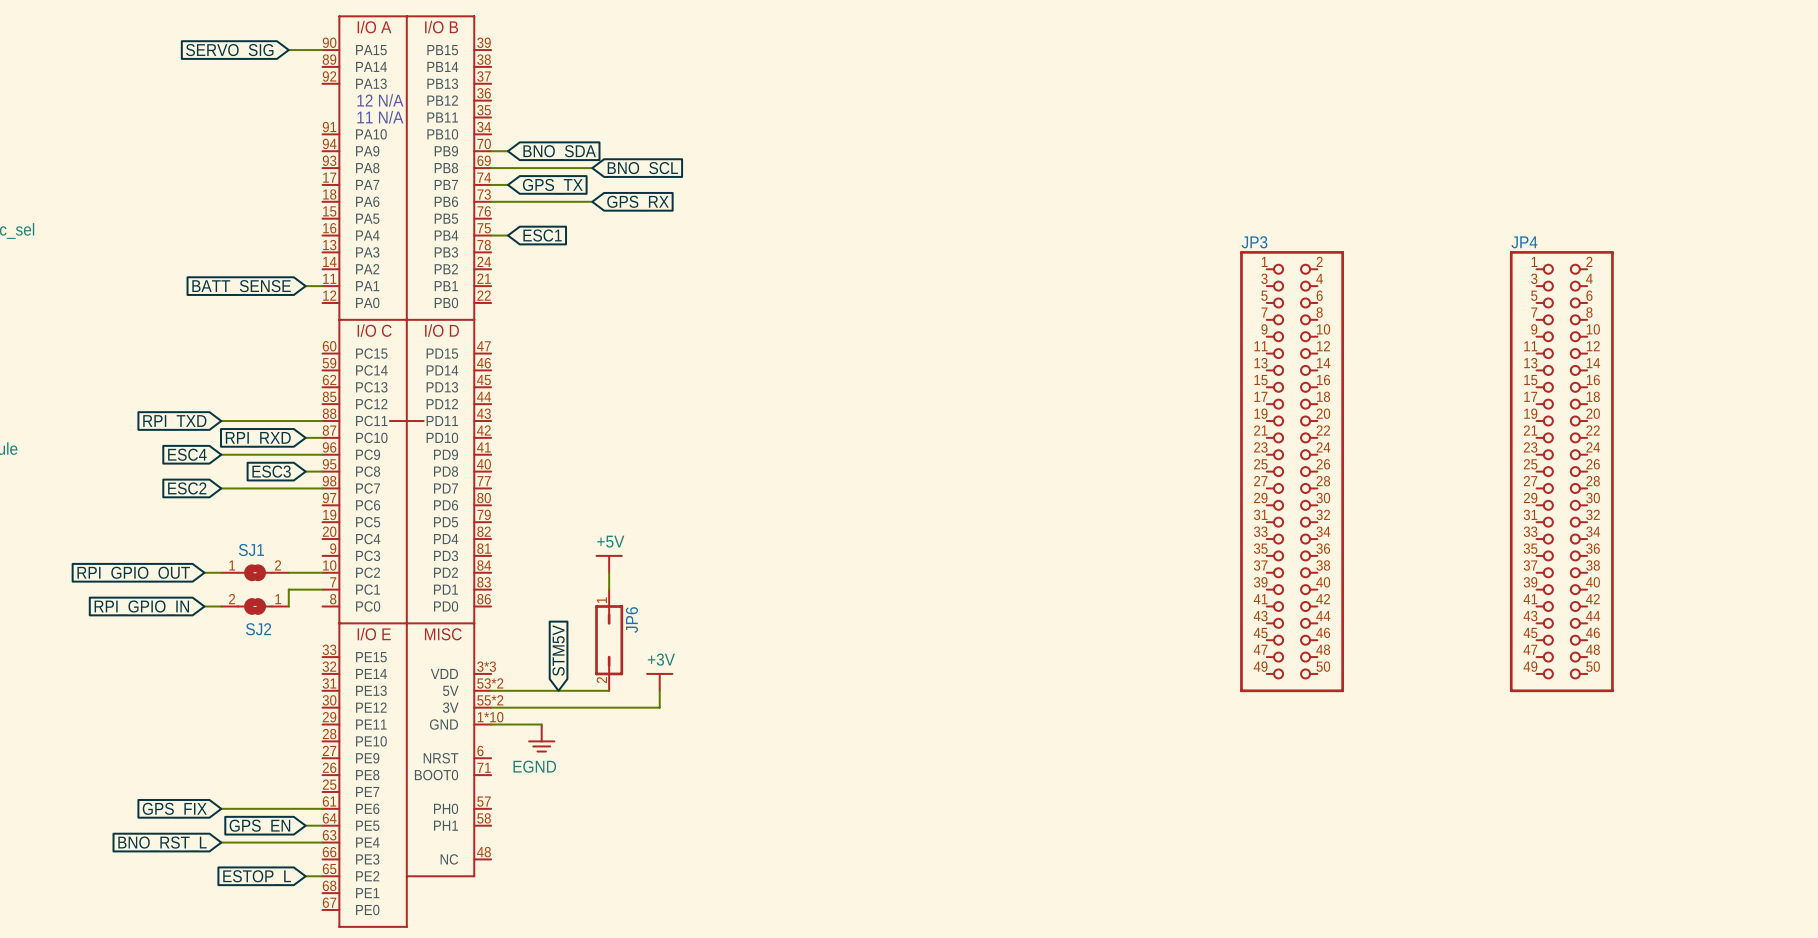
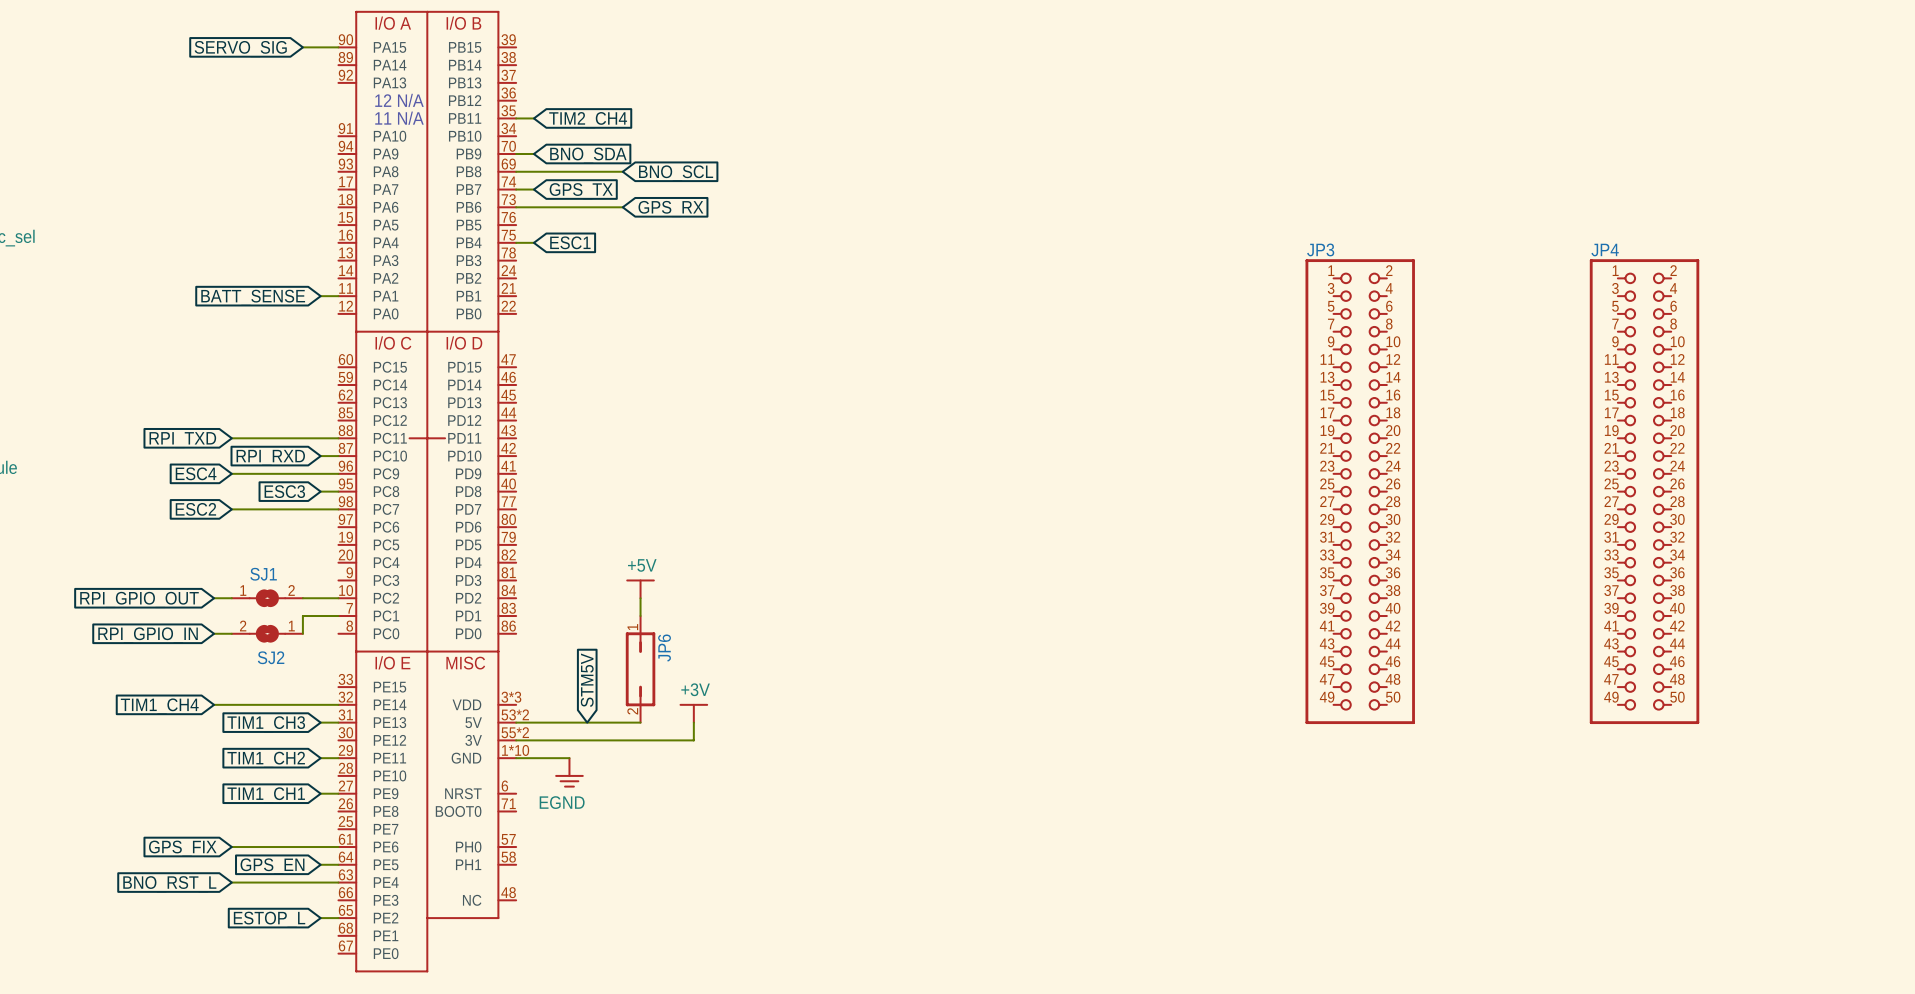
wire: none -> (516, 118) (533, 118)
global label: none -> TIM2_CH4 (588, 120)
wire: none -> (214, 704) (338, 704)
global label: none -> TIM1_CH4 (159, 706)
wire: none -> (320, 722) (338, 722)
global label: none -> TIM1_CH3 (266, 724)
wire: none -> (320, 758) (338, 758)
global label: none -> TIM1_CH2 (266, 759)
wire: none -> (320, 793) (338, 793)
global label: none -> TIM1_CH1 (266, 795)

